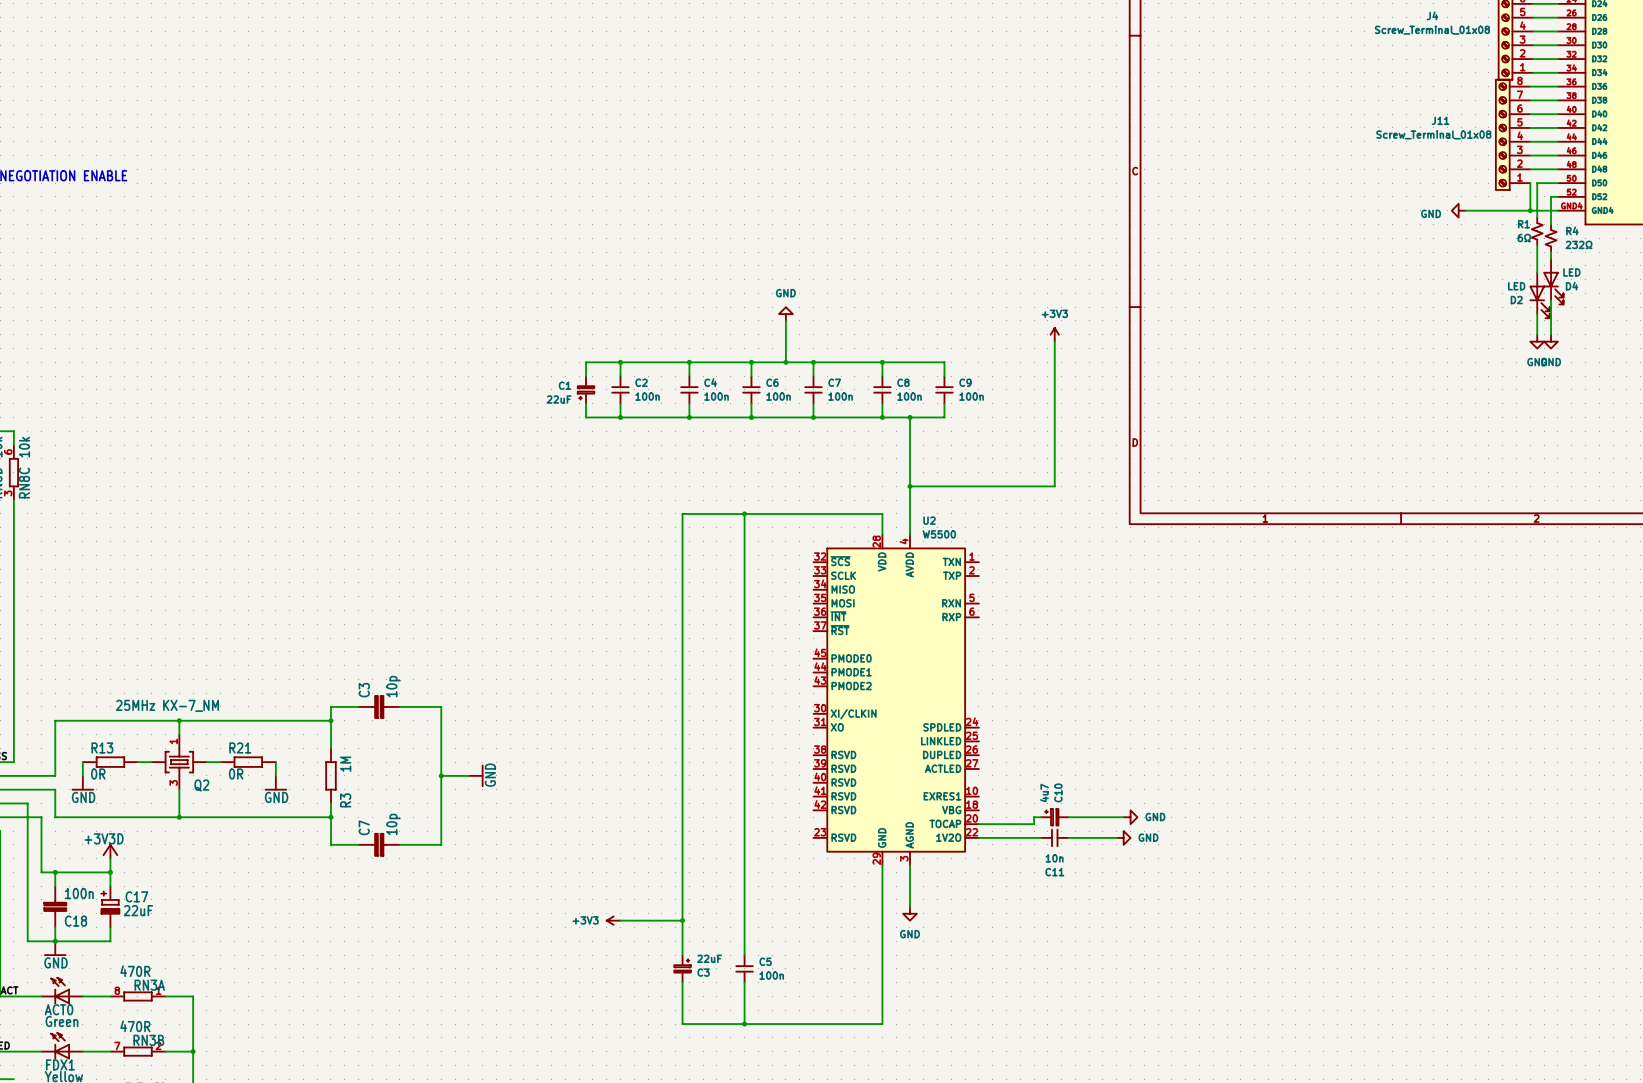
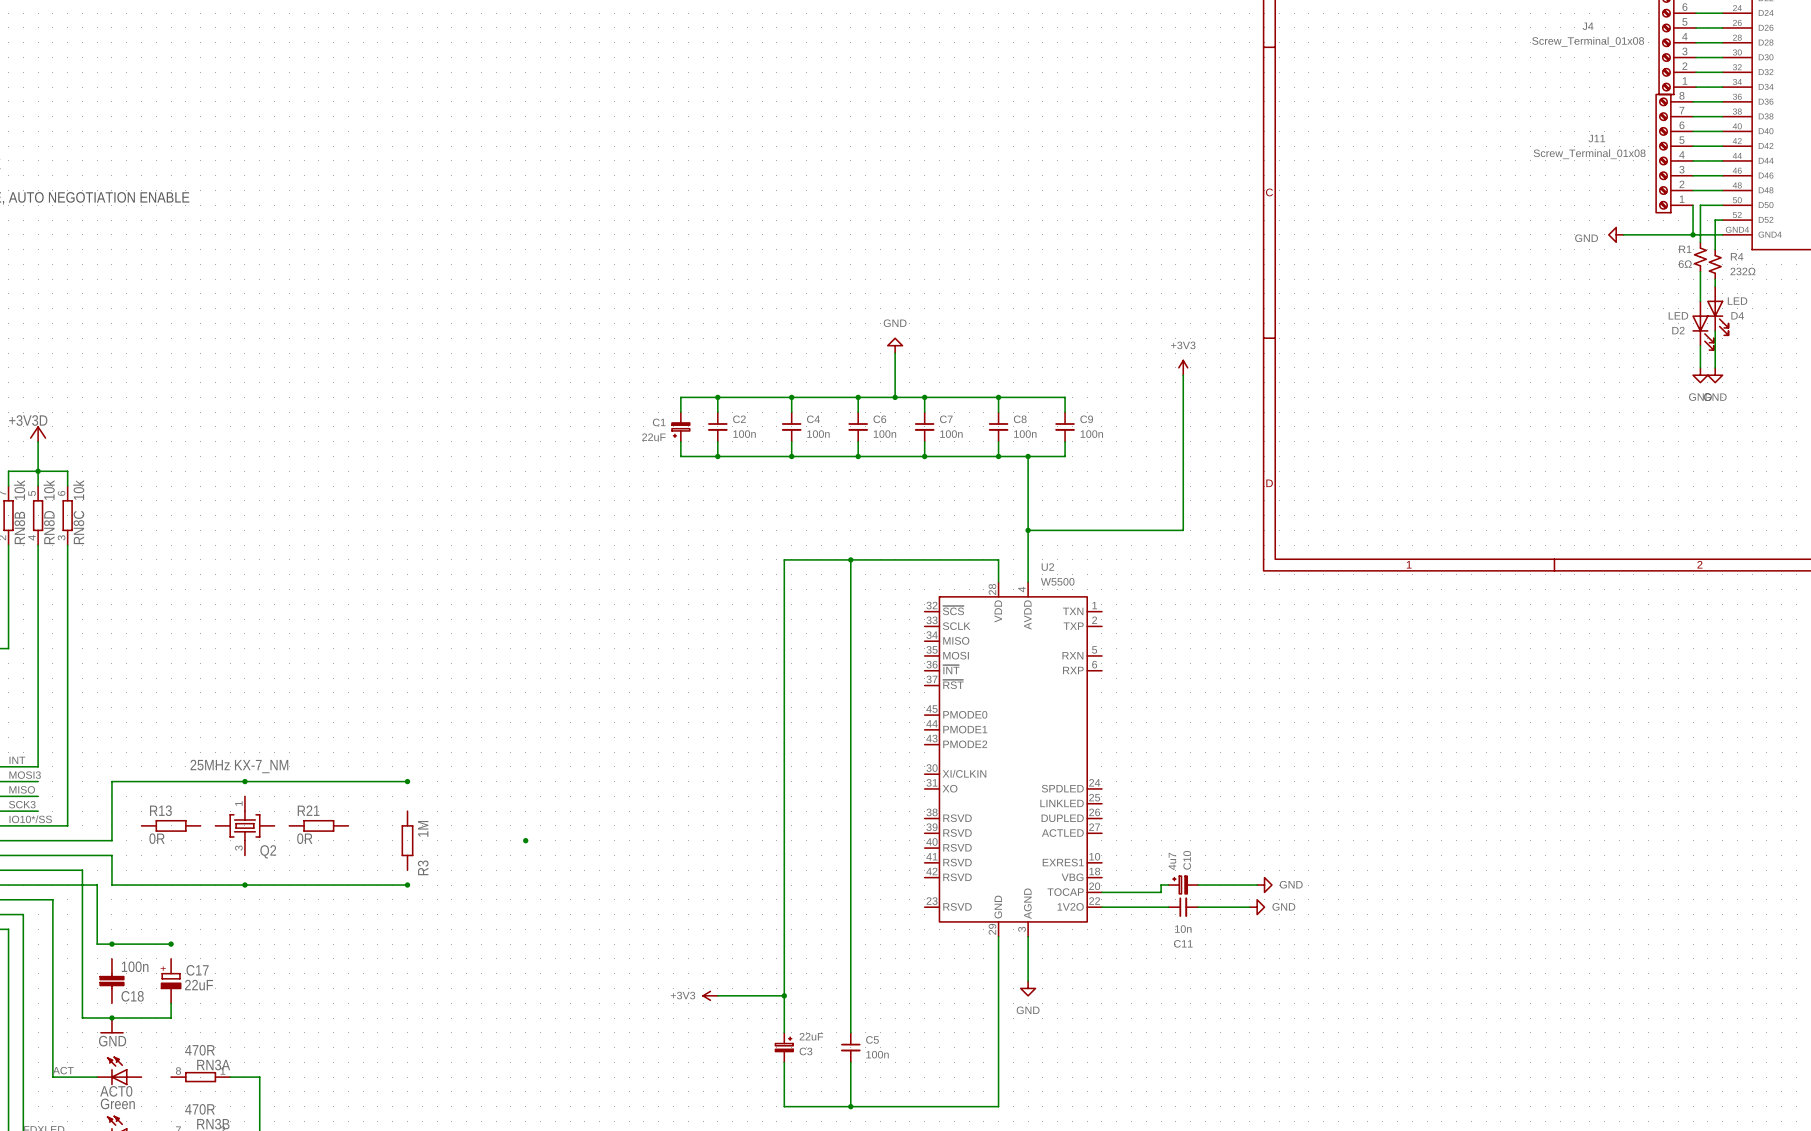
wire: (358, 706) (330, 706) (330, 748) -> none
C3: 10p (379, 706) -> none
wire: (399, 706) (441, 706) (441, 844) (399, 844) -> none
wire: (179, 720) (179, 734) -> none
wire: (82, 762) (82, 775) -> none
wire: (137, 762) (151, 762) -> none
wire: (206, 762) (220, 762) -> none
wire: (275, 762) (275, 775) -> none
wire: (441, 775) (468, 775) -> none
power symbol: GND (476, 775) -> none
power symbol: GND (82, 783) -> none
power symbol: GND (275, 783) -> none
wire: (179, 789) (179, 817) -> none
wire: (330, 803) (330, 844) (358, 844) -> none
C7: 10p (379, 844) -> none
power symbol: +3V3D (110, 851) -> none
wire: (110, 858) (110, 886) -> none
wire: (55, 872) (55, 886) -> none
wire: (55, 927) (55, 941) -> none
wire: (82, 996) (110, 996) -> none

